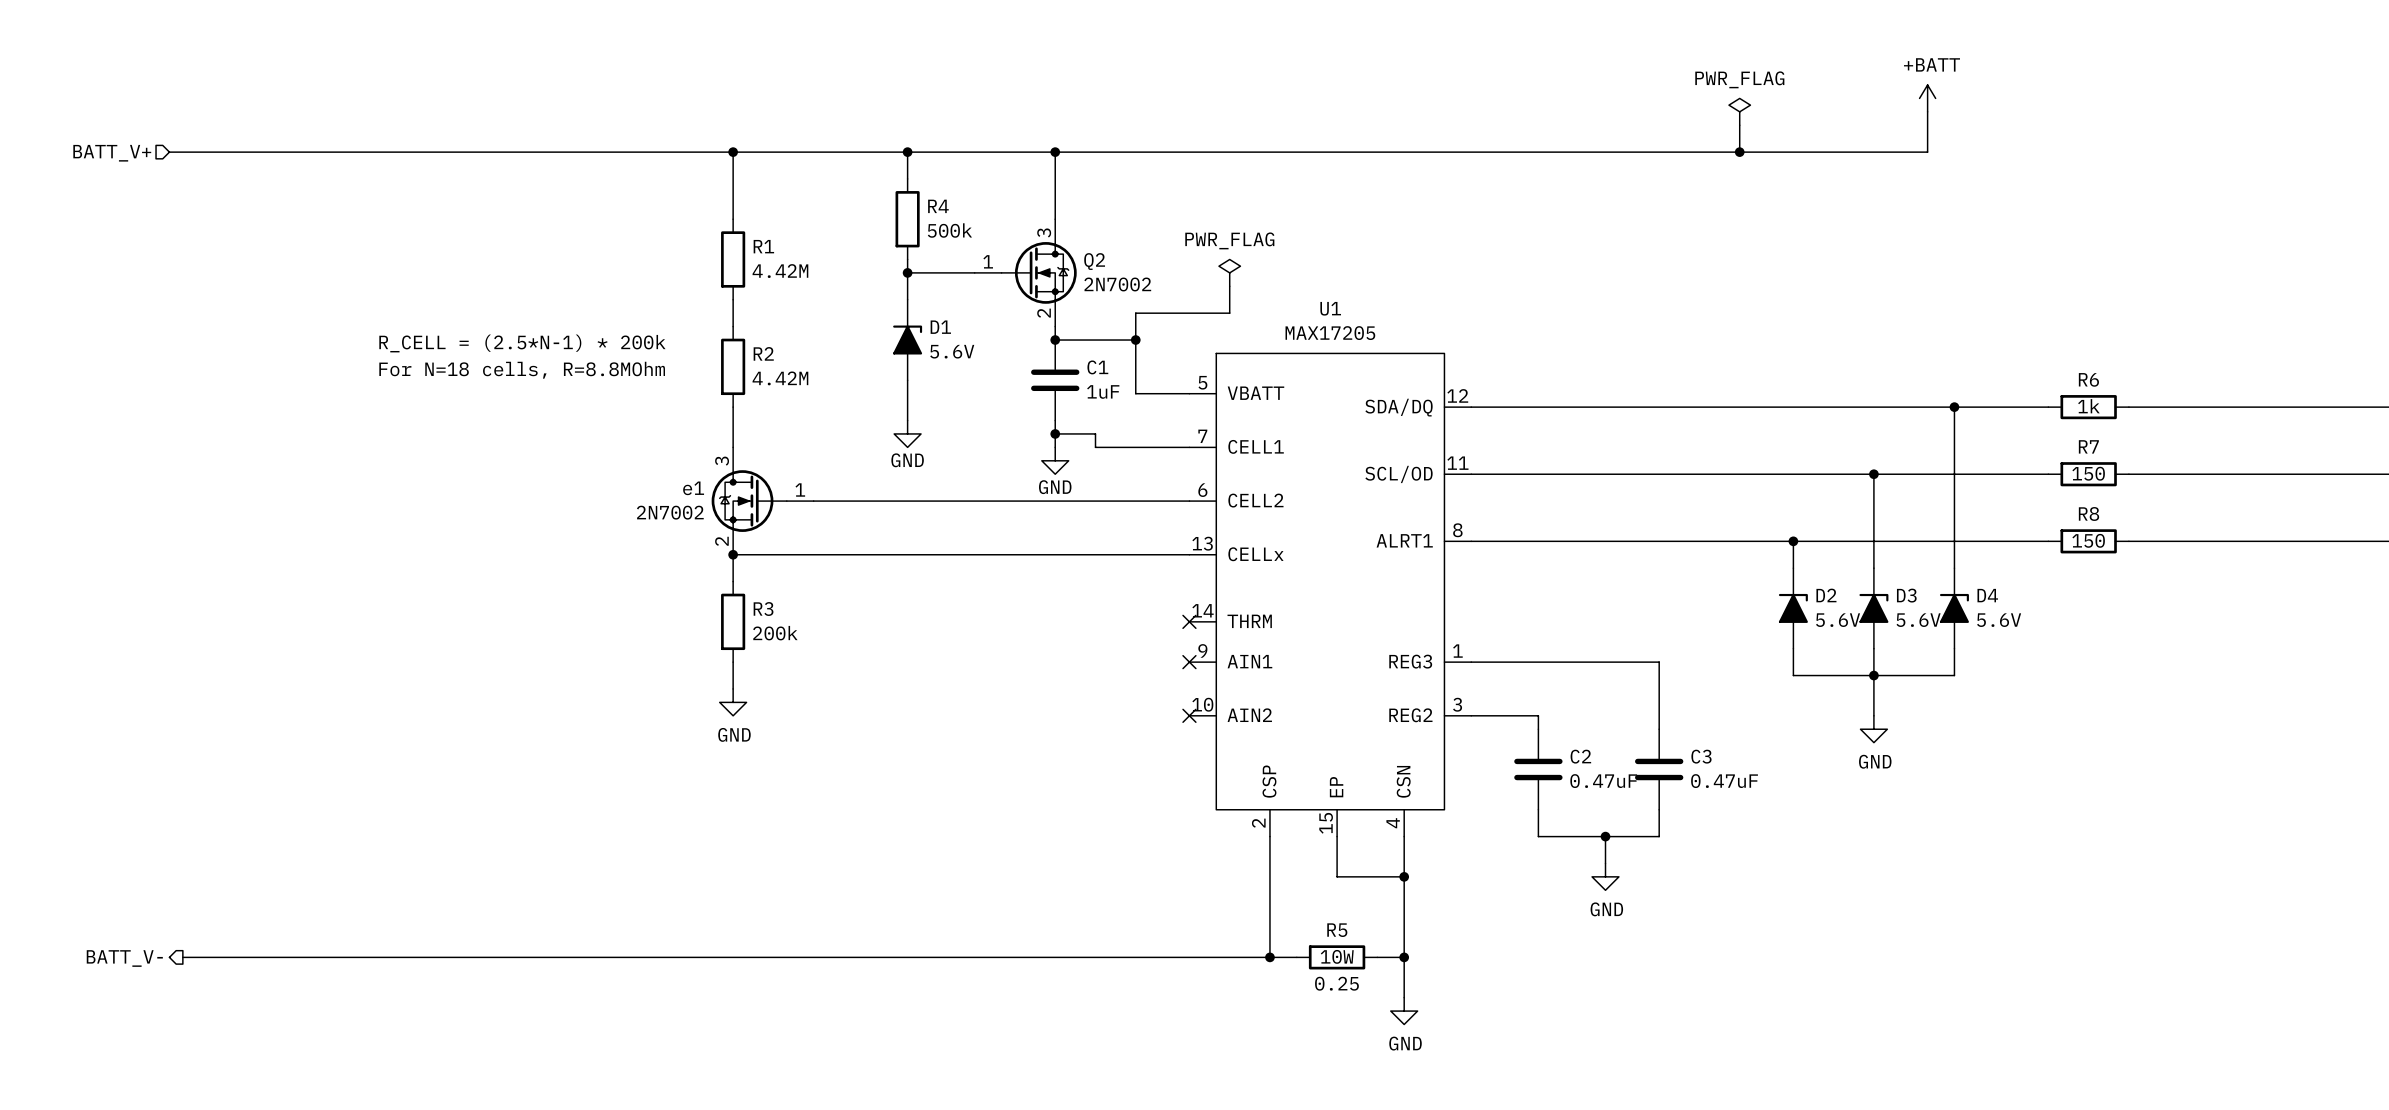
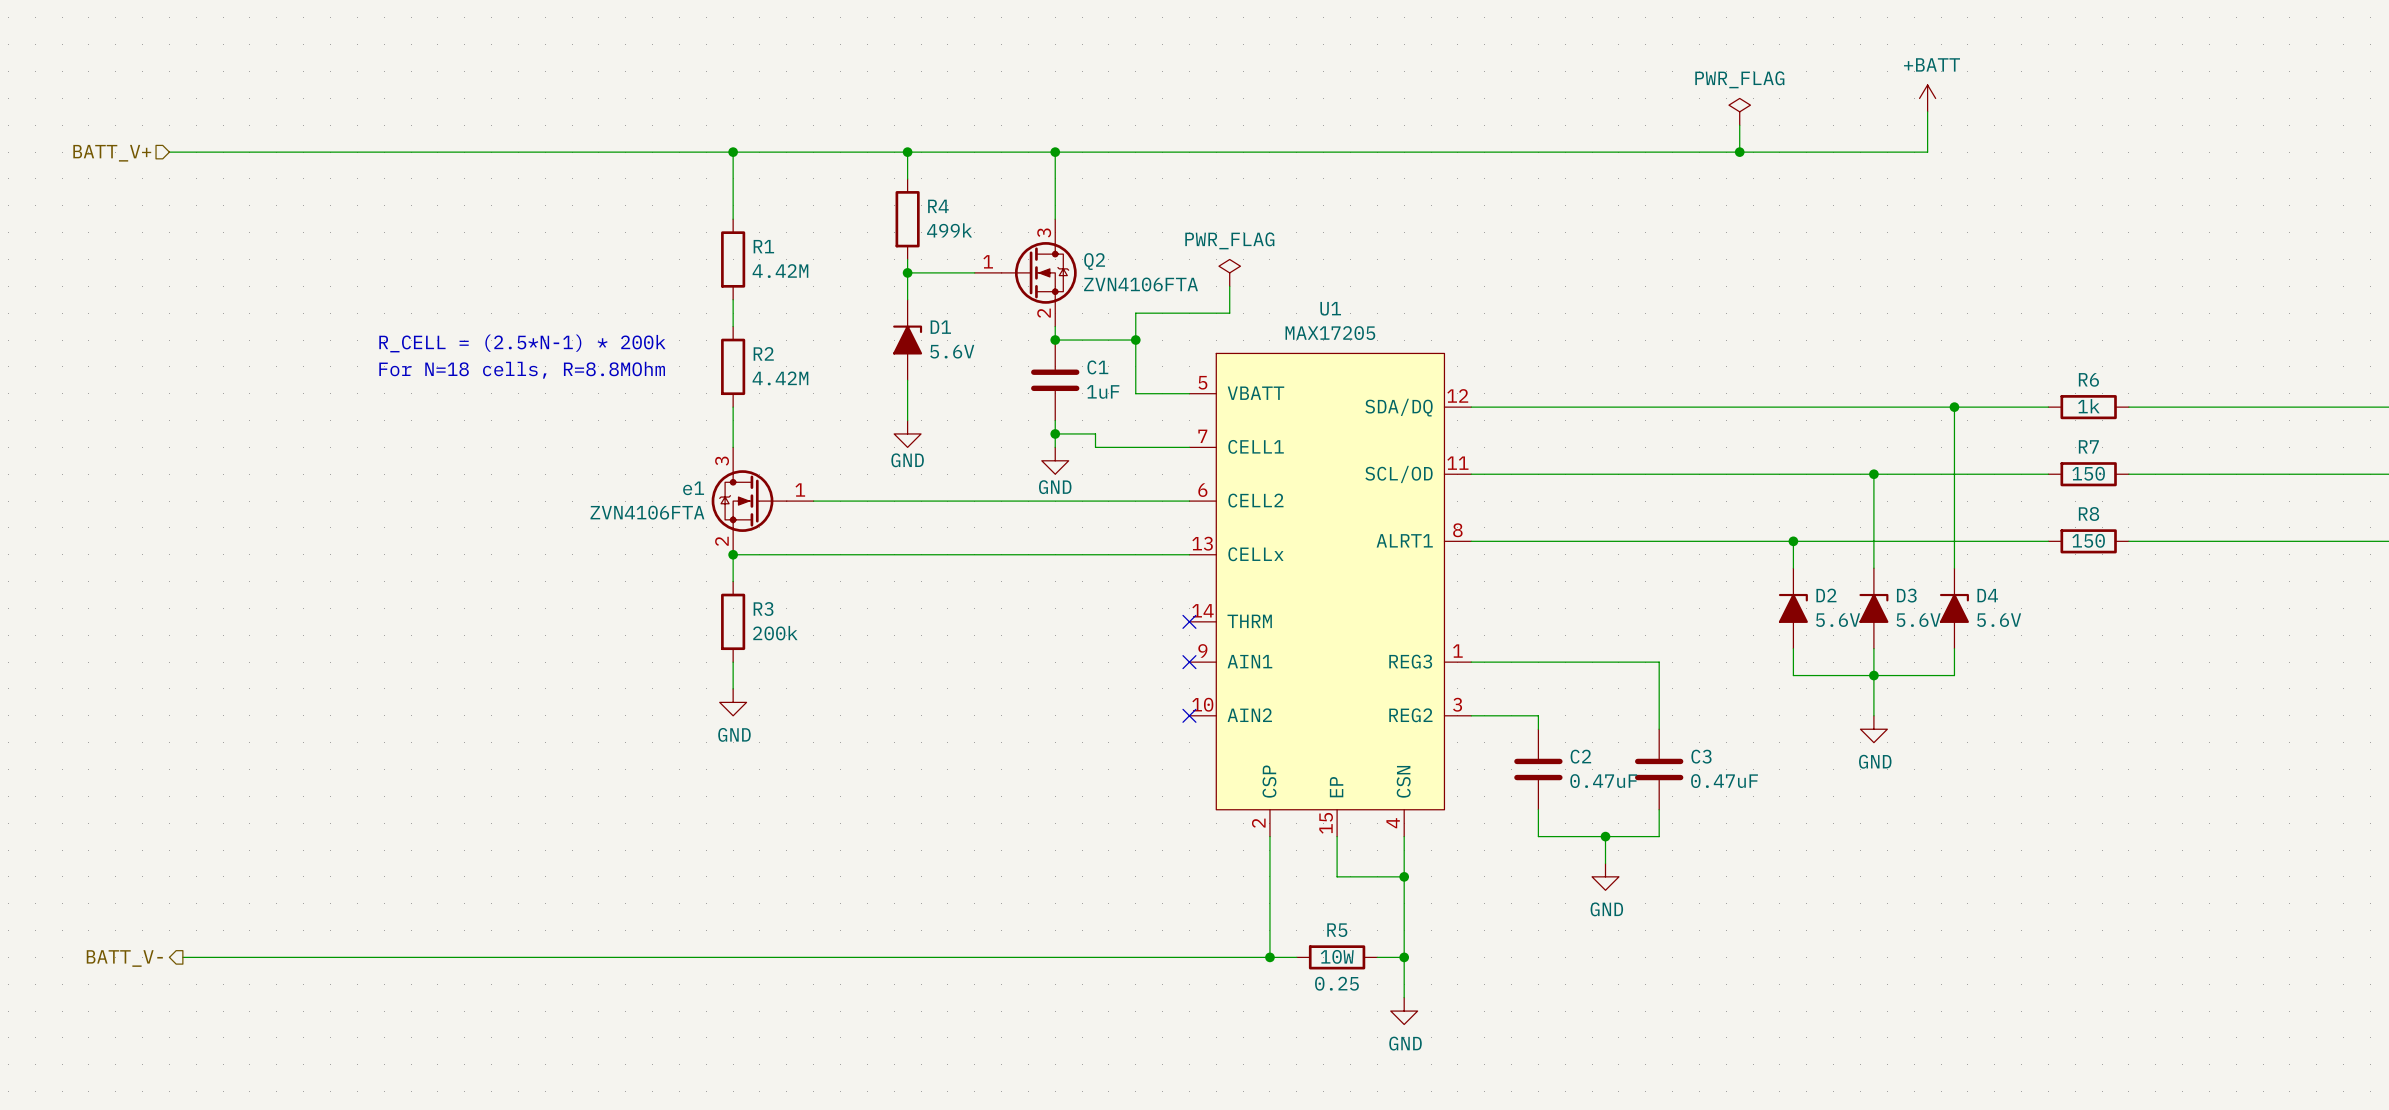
R4 value: 500k (949, 230) -> 499k (949, 230)
Q2 value: 2N7002 (1117, 284) -> ZVN4106FTA (1141, 284)
e1 value: 2N7002 (670, 512) -> ZVN4106FTA (647, 512)

